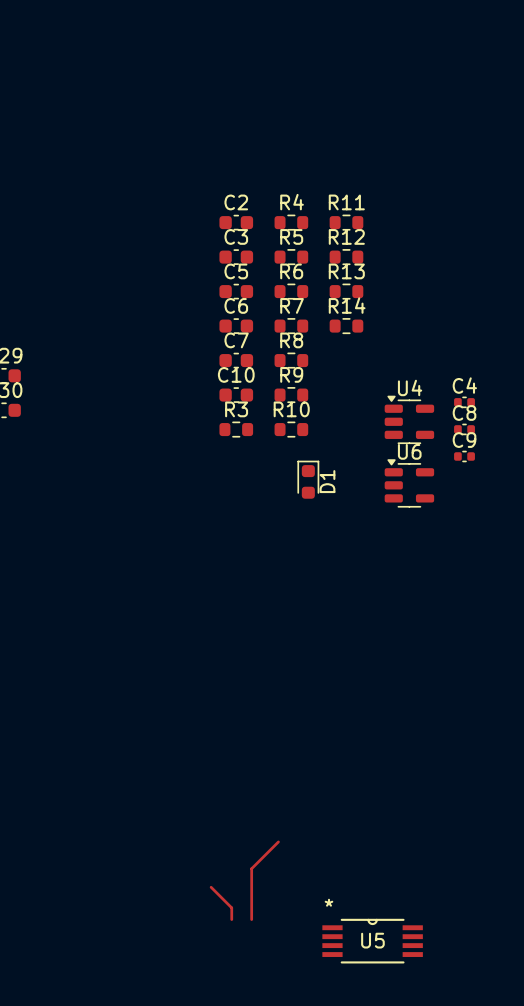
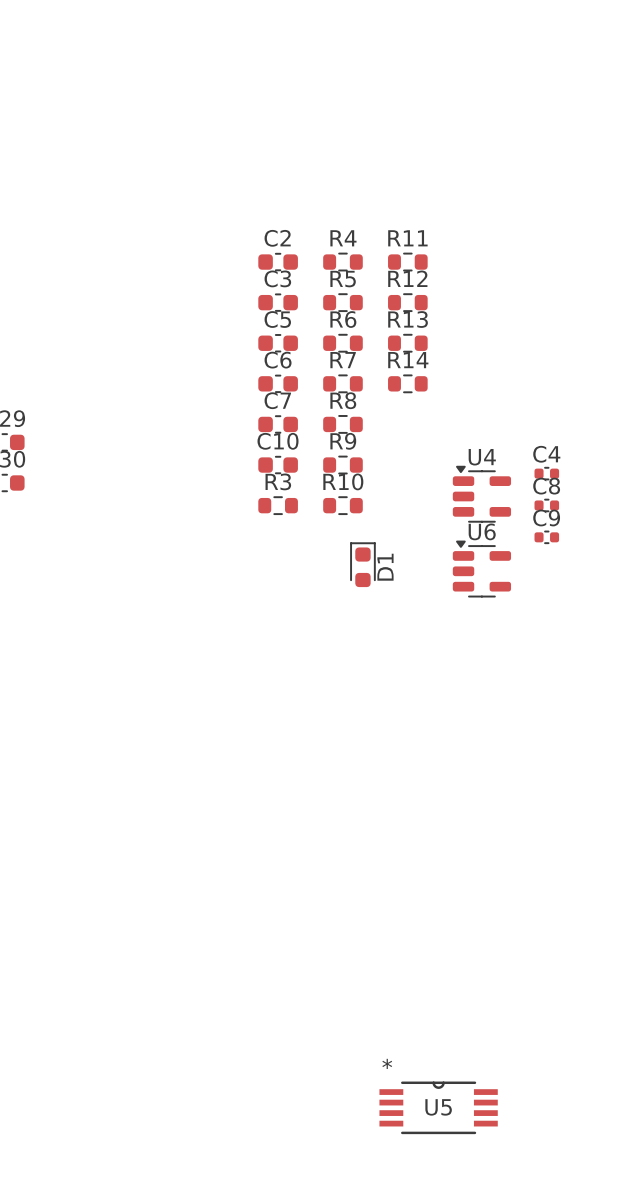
track: (278, 841) (251, 868) (251, 919) -> none
track: (211, 887) (231, 907) (231, 919) -> none

